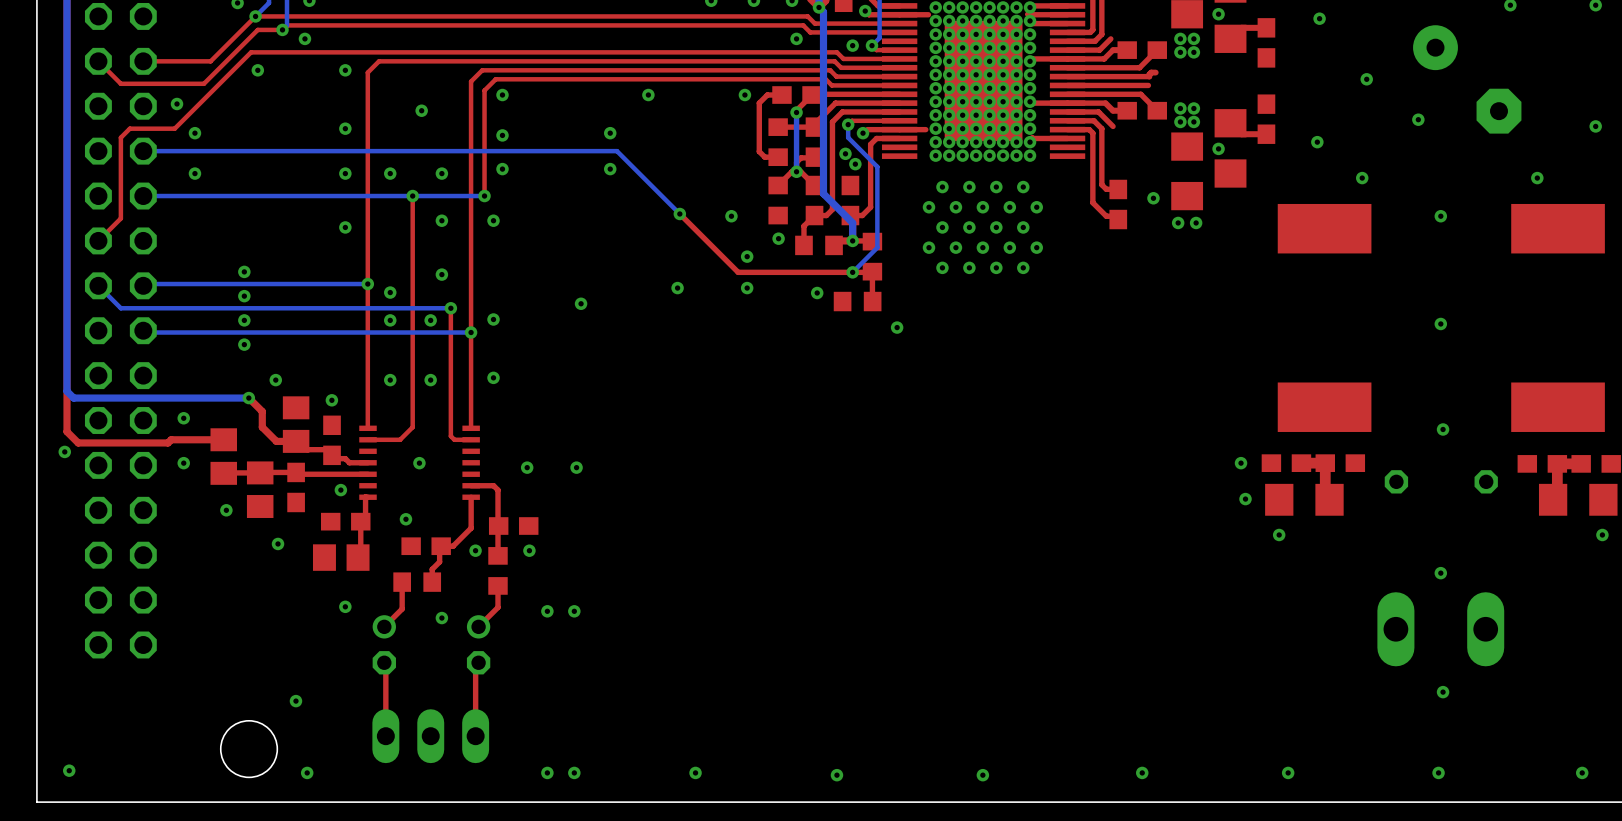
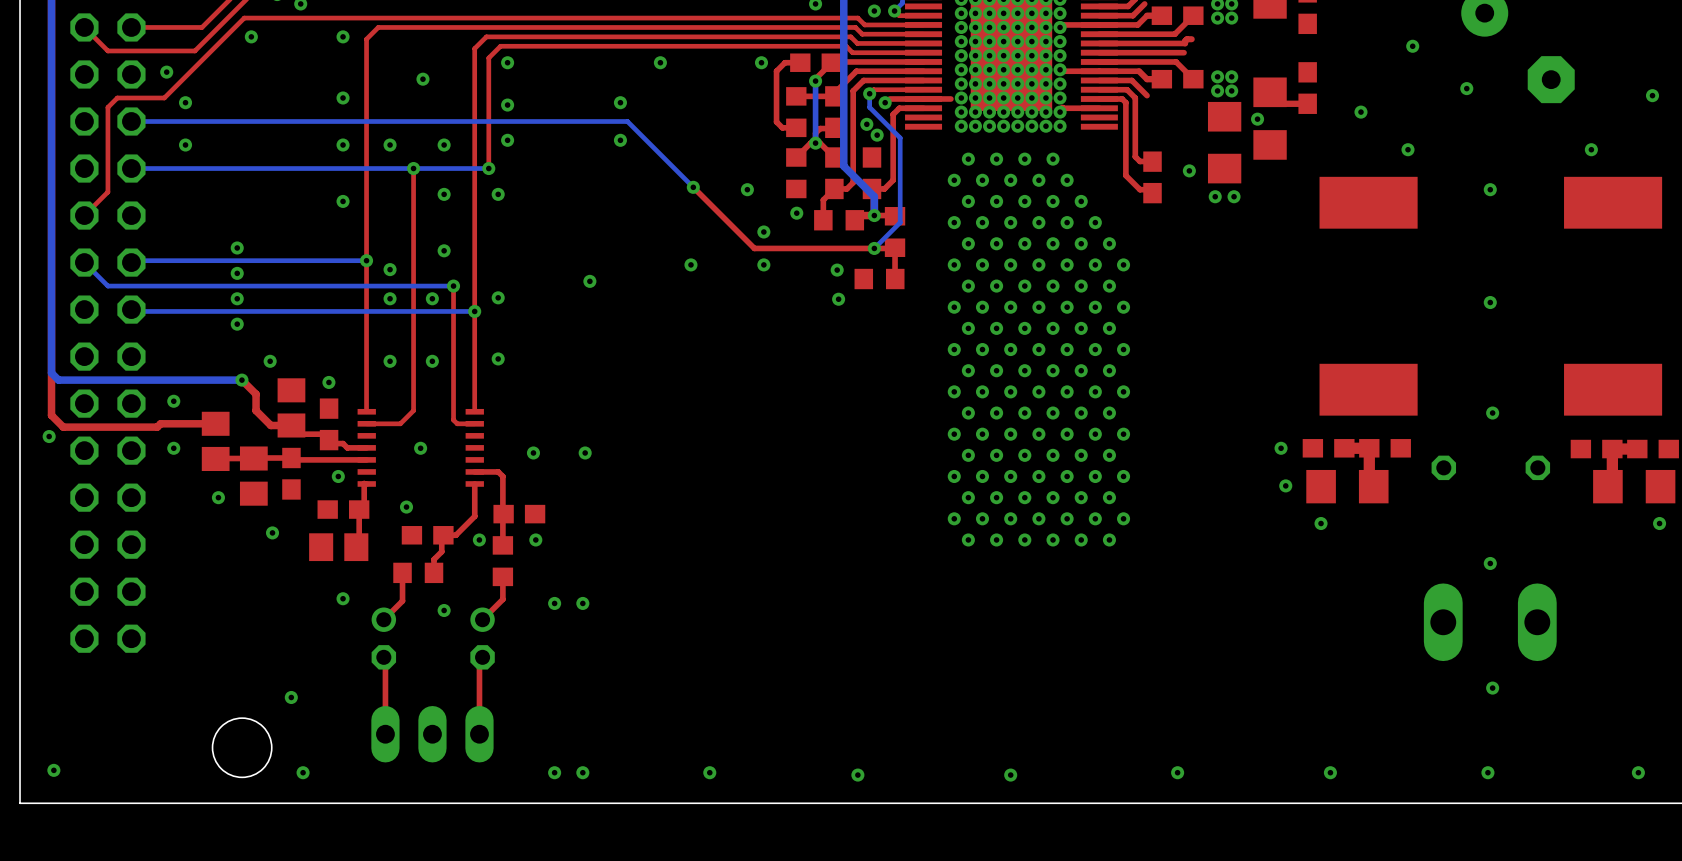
via: none -> (1081, 201)
via: none -> (1095, 222)
via: none -> (1081, 243)
via: none -> (1109, 243)
via: none -> (954, 264)
via: none -> (982, 264)
via: none -> (1010, 264)
via: none -> (1038, 264)
via: none -> (1067, 264)
via: none -> (1095, 264)
via: none -> (1123, 264)
via: none -> (968, 286)
via: none -> (996, 286)
via: none -> (1024, 286)
via: none -> (1053, 286)
via: none -> (1081, 286)
via: none -> (1109, 286)
via: none -> (838, 299)
via: (897, 327) -> none
via: none -> (954, 307)
via: none -> (982, 307)
via: none -> (1010, 307)
via: none -> (1038, 307)
via: none -> (1067, 307)
via: none -> (1095, 307)
via: none -> (1123, 307)
via: none -> (968, 328)
via: none -> (996, 328)
via: none -> (1024, 328)
via: none -> (1053, 328)
via: none -> (1081, 328)
via: none -> (1109, 328)
via: none -> (954, 349)
via: none -> (982, 349)
via: none -> (1010, 349)
via: none -> (1038, 349)
via: none -> (1067, 349)
via: none -> (1095, 349)
via: none -> (1123, 349)
via: none -> (968, 370)
via: none -> (996, 370)
via: none -> (1024, 370)
via: none -> (1053, 370)
via: none -> (1081, 370)
via: none -> (1109, 370)
via: none -> (954, 391)
via: none -> (982, 391)
via: none -> (1010, 391)
via: none -> (1038, 391)
via: none -> (1067, 391)
via: none -> (1095, 391)
via: none -> (1123, 391)
via: none -> (968, 413)
via: none -> (996, 413)
via: none -> (1024, 413)
via: none -> (1053, 413)
via: none -> (1081, 413)
via: none -> (1109, 413)
via: none -> (954, 434)
via: none -> (982, 434)
via: none -> (1010, 434)
via: none -> (1038, 434)
via: none -> (1067, 434)
via: none -> (1095, 434)
via: none -> (1123, 434)
via: none -> (968, 455)
via: none -> (996, 455)
via: none -> (1024, 455)
via: none -> (1053, 455)
via: none -> (1081, 455)
via: none -> (1109, 455)
via: none -> (954, 476)
via: none -> (982, 476)
via: none -> (1010, 476)
via: none -> (1038, 476)
via: none -> (1067, 476)
via: none -> (1095, 476)
via: none -> (1123, 476)
via: none -> (968, 497)
via: none -> (996, 497)
via: none -> (1024, 497)
via: none -> (1053, 497)
via: none -> (1081, 497)
via: none -> (1109, 497)
via: none -> (954, 518)
via: none -> (982, 518)
via: none -> (1010, 518)
via: none -> (1038, 518)
via: none -> (1067, 518)
via: none -> (1095, 518)
via: none -> (1123, 518)
via: none -> (968, 539)
via: none -> (996, 539)
via: none -> (1024, 539)
via: none -> (1053, 539)
via: none -> (1081, 539)
via: none -> (1109, 539)

